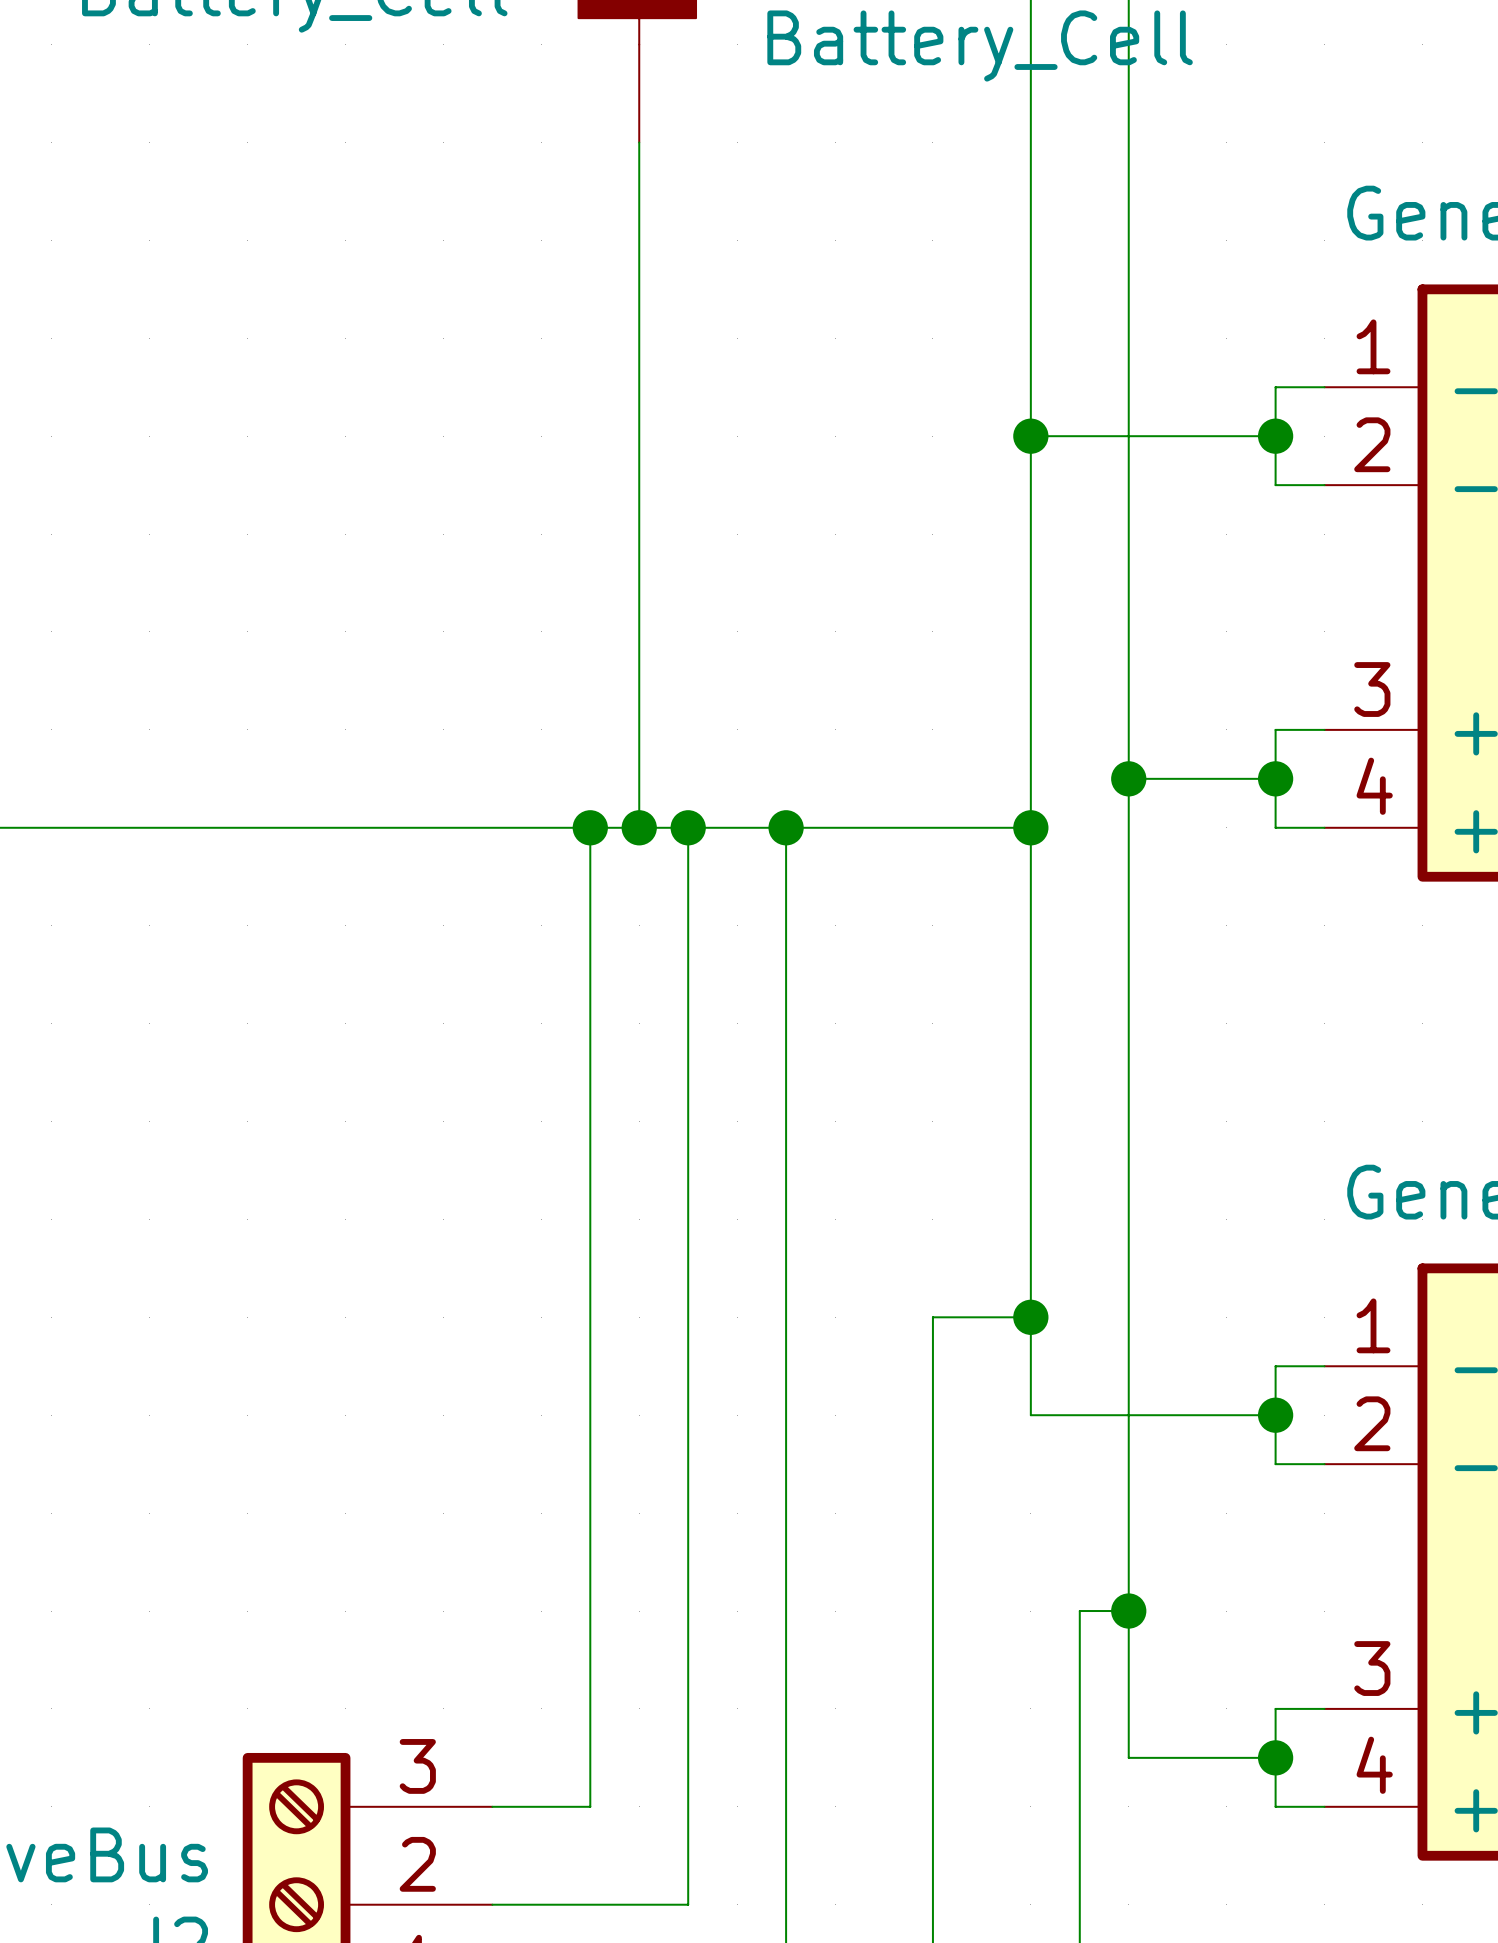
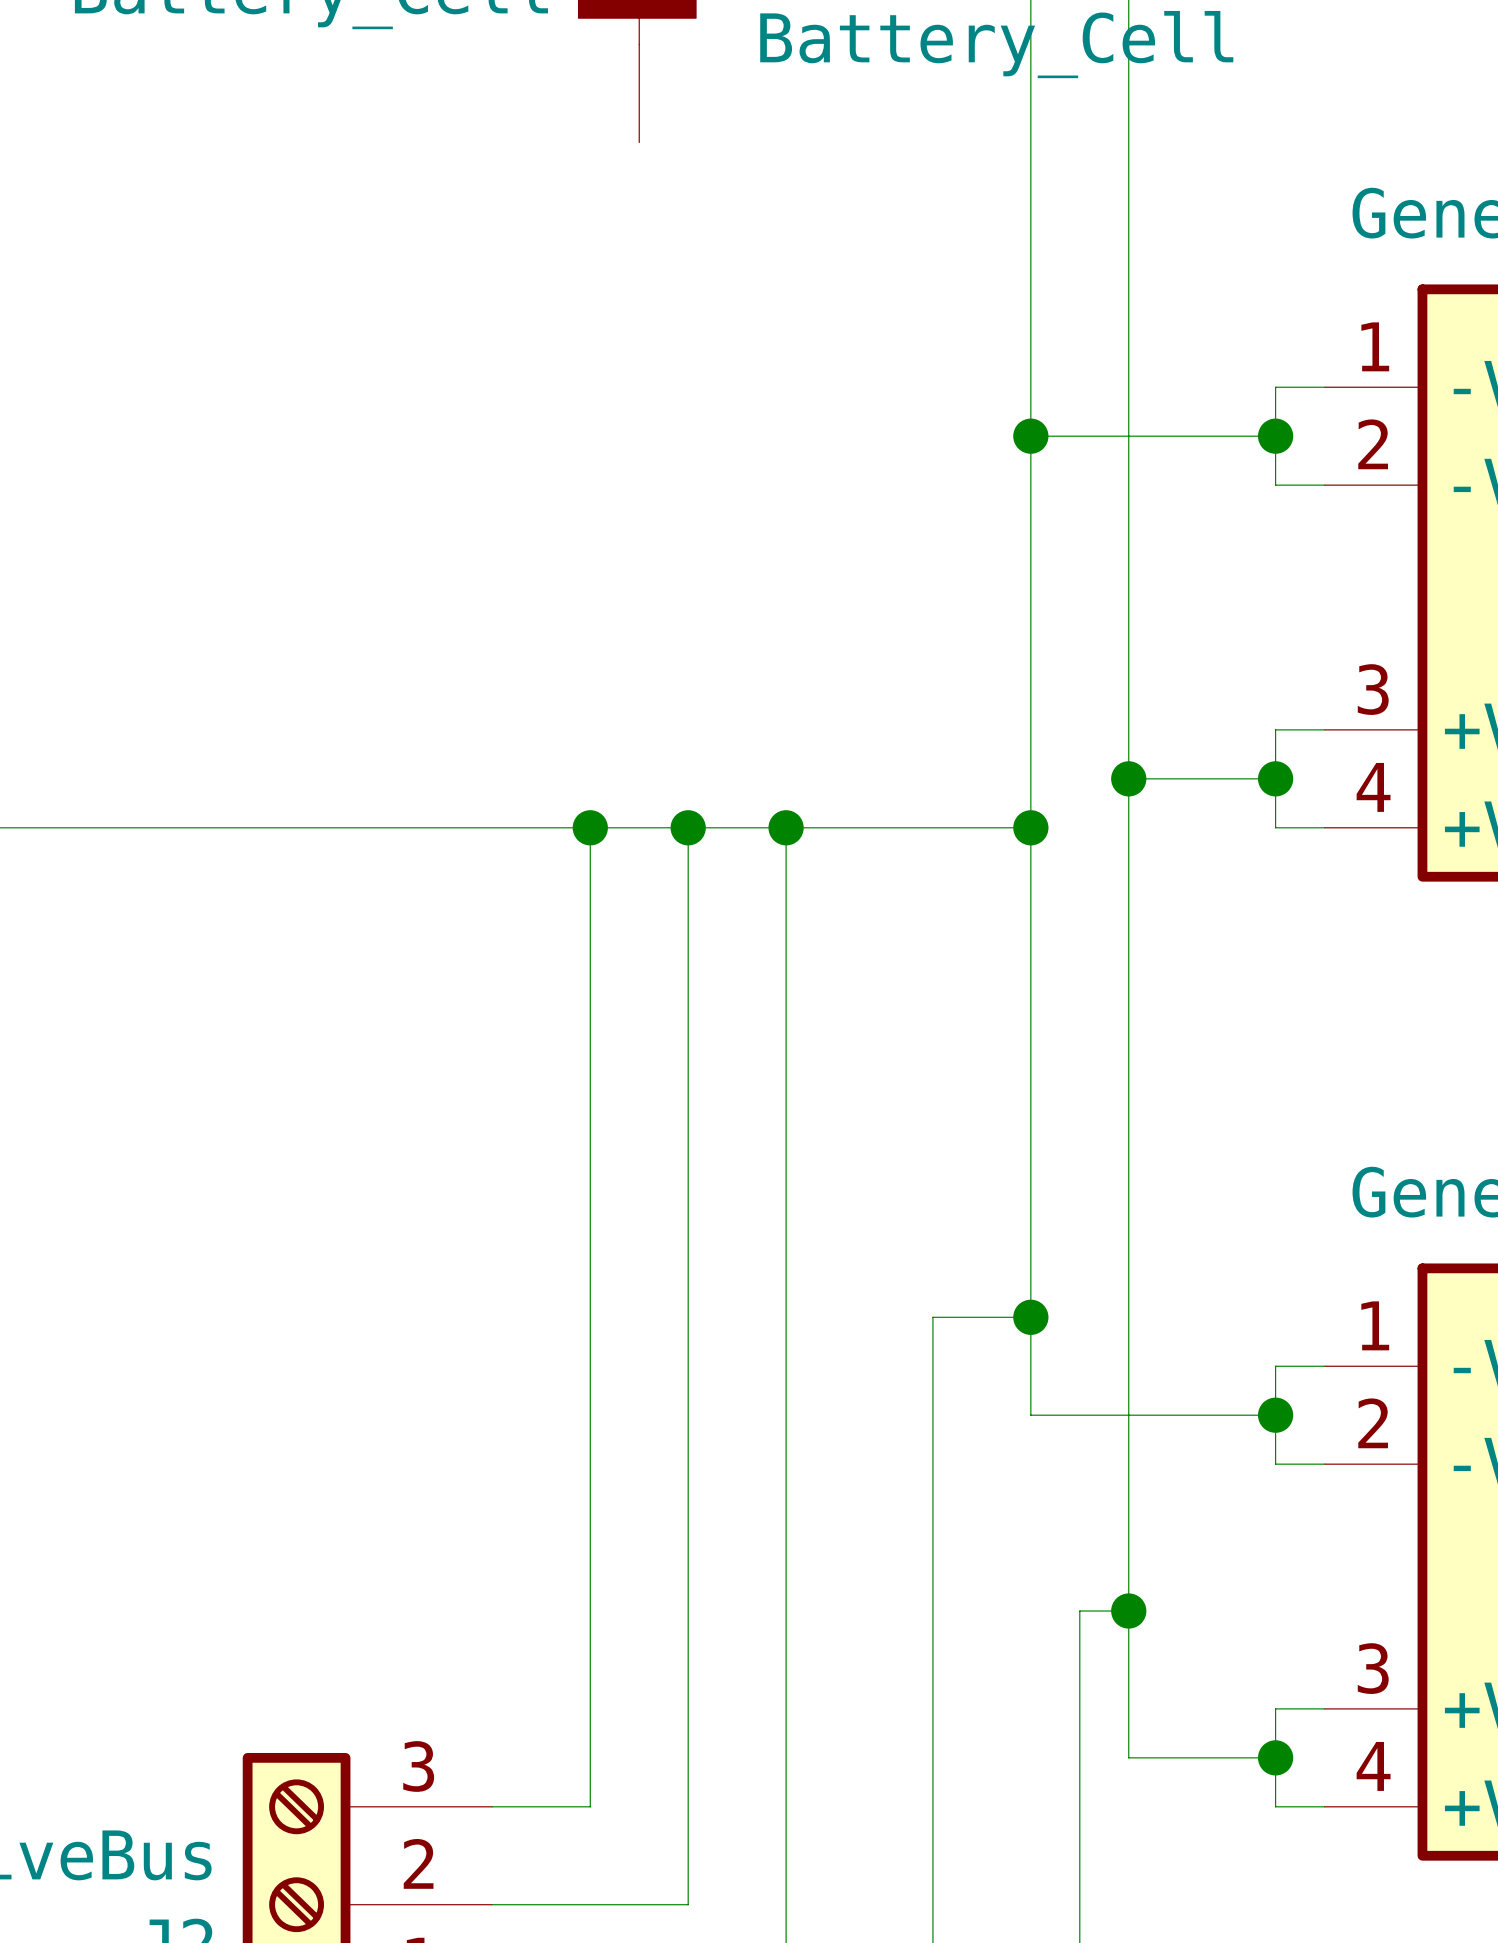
wire: (639, 142) (639, 827) -> none
junction: (639, 827) -> none

